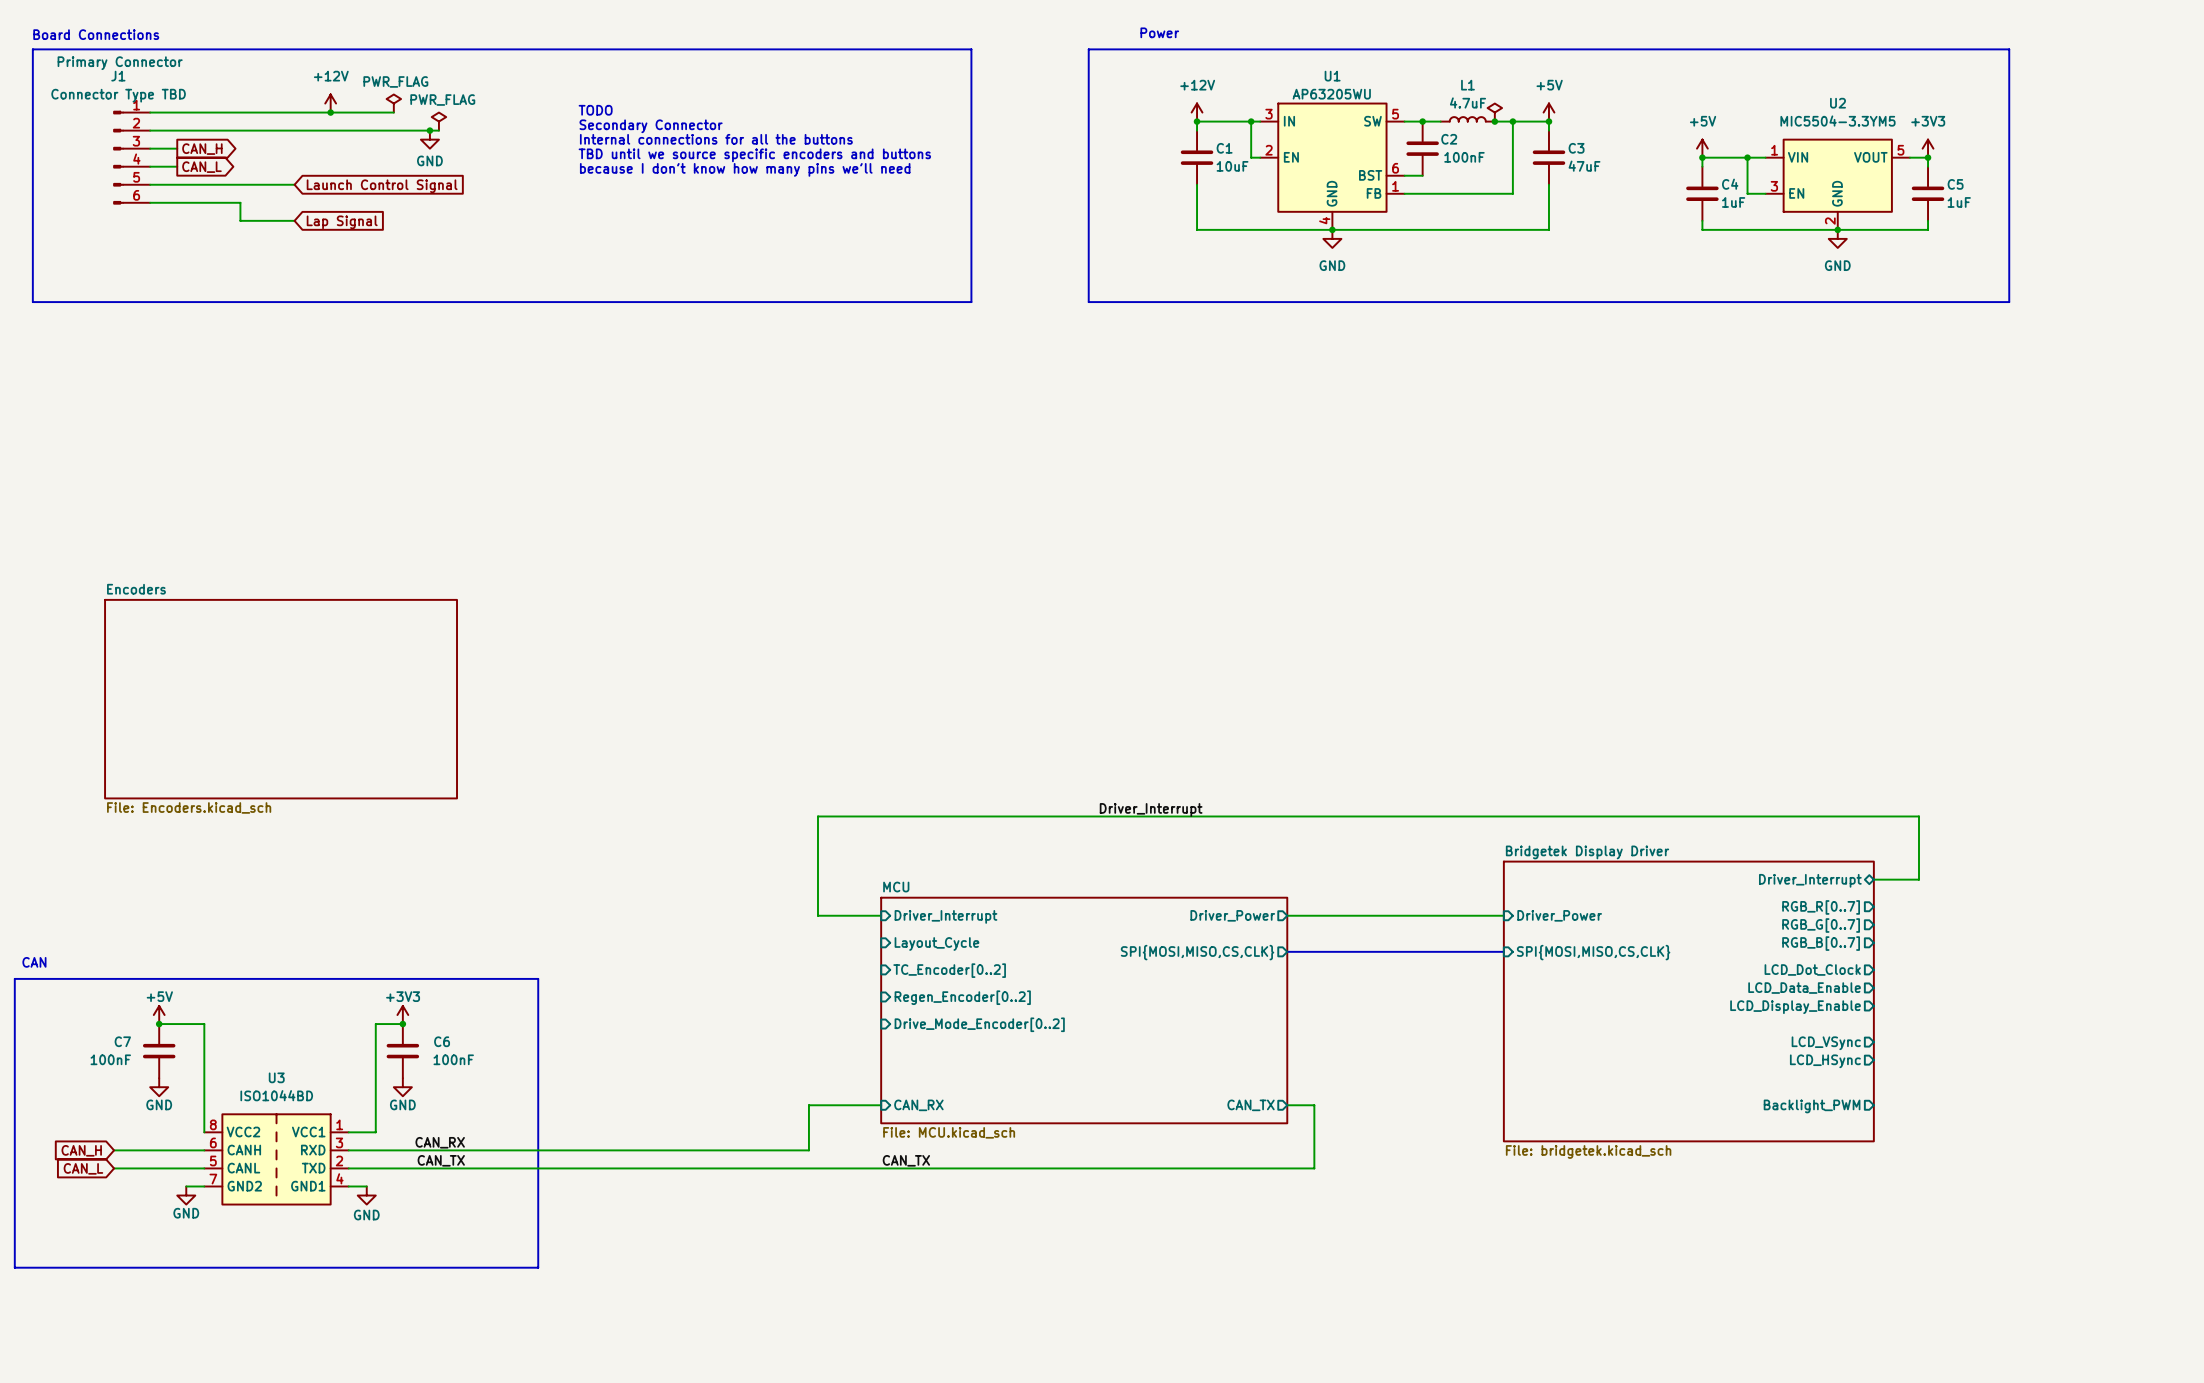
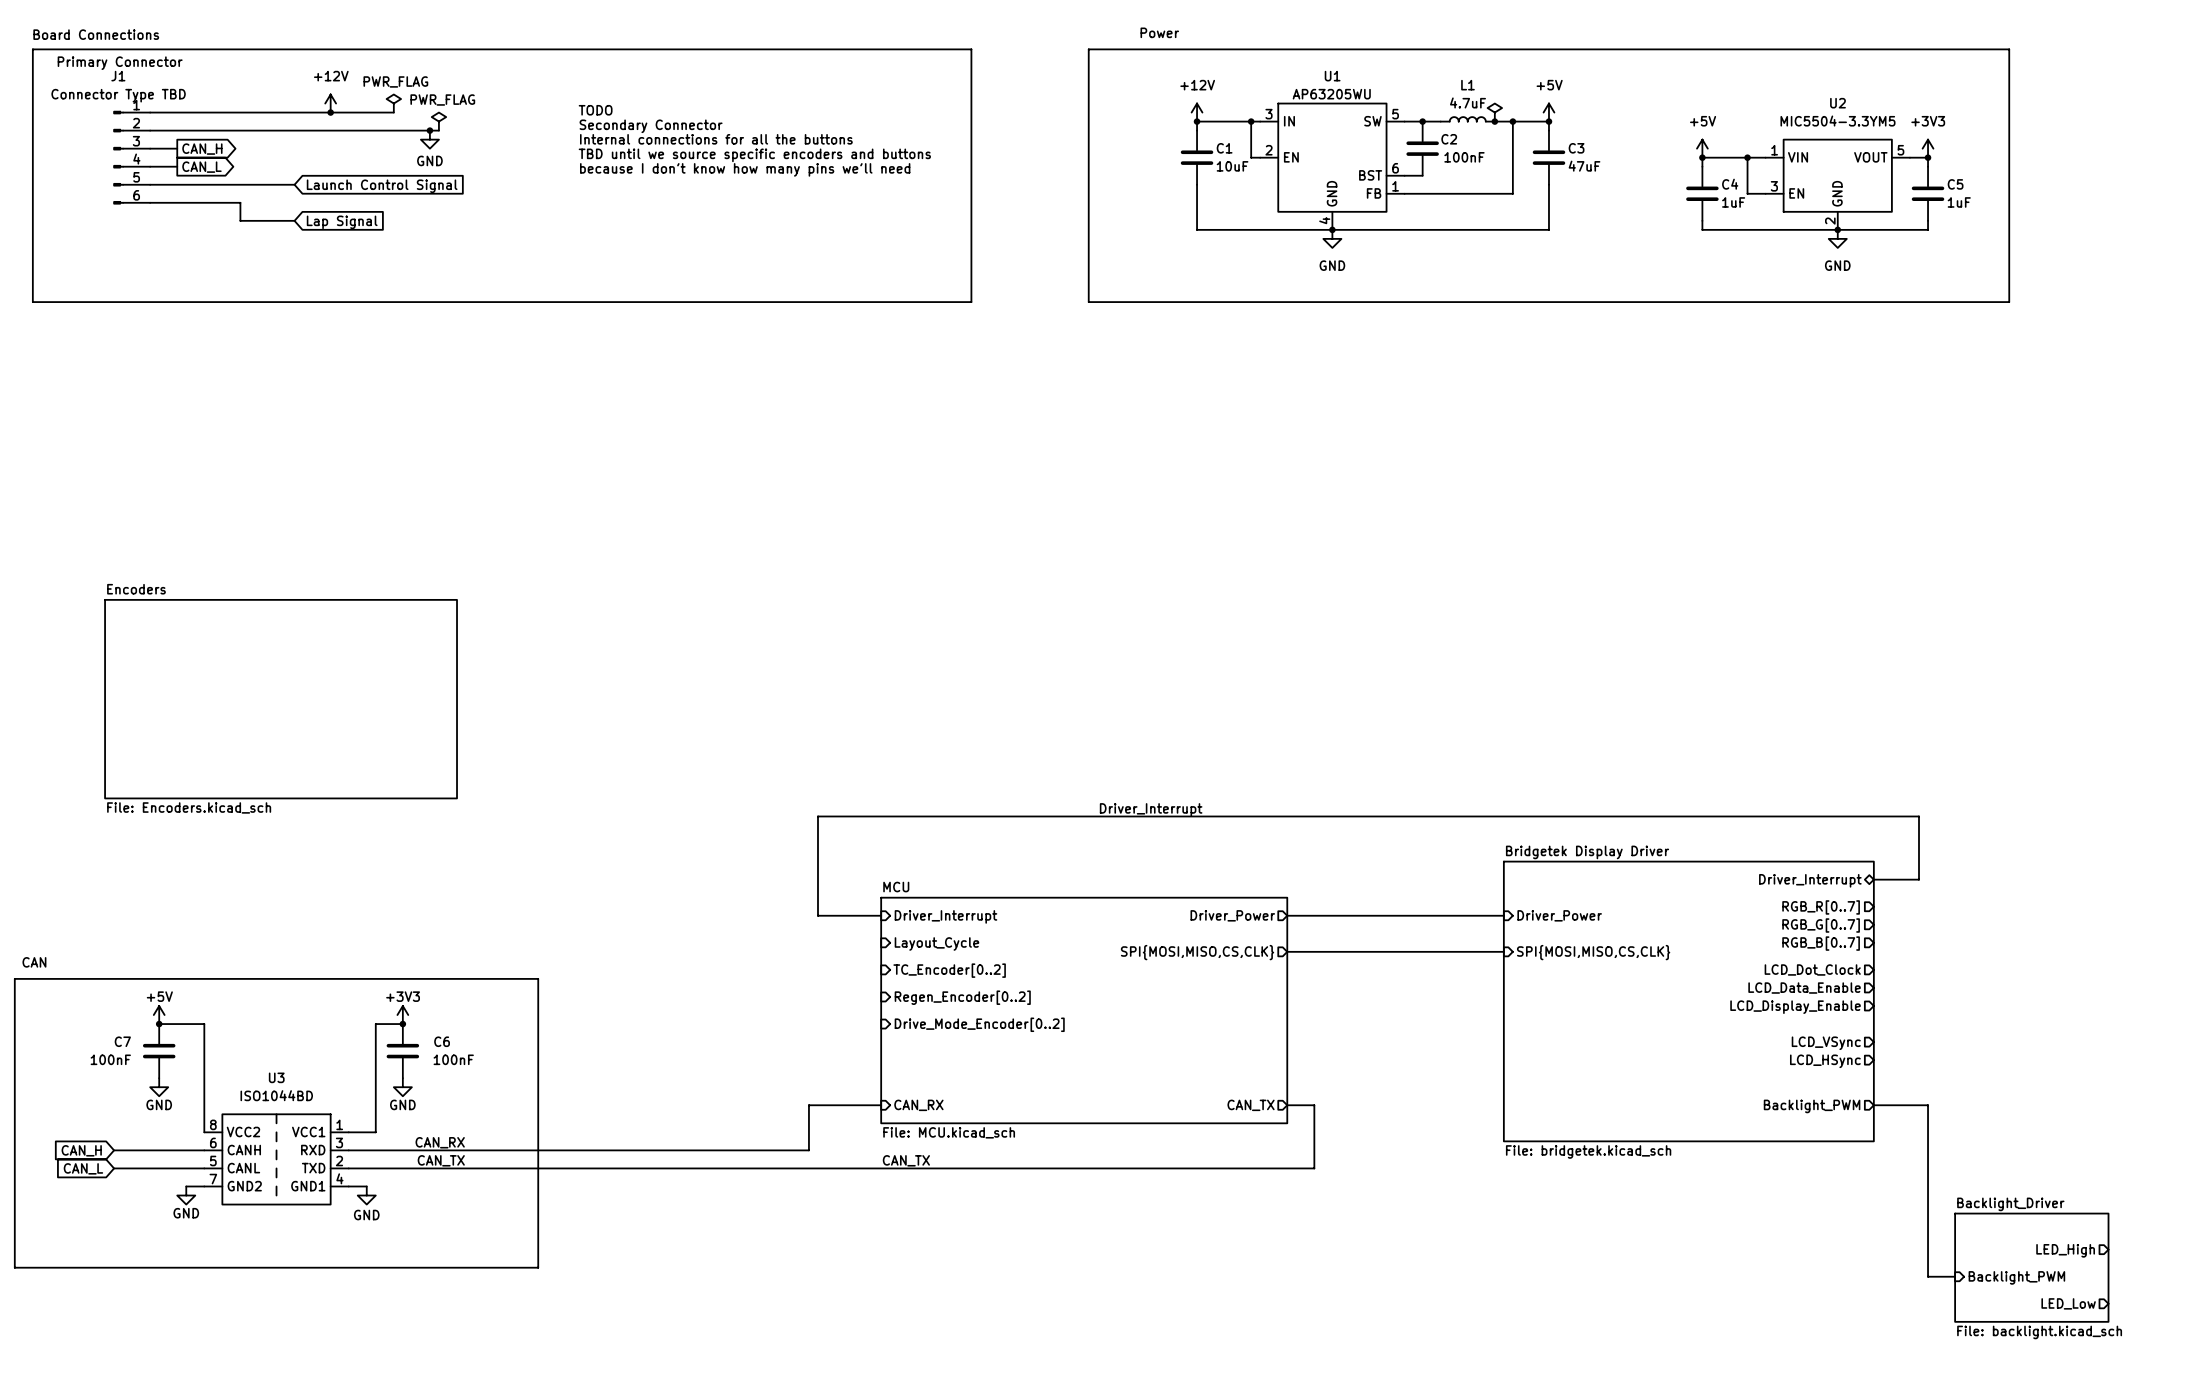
wire: none -> (1873, 1105) (1928, 1105) (1928, 1276) (1955, 1276)
sheet pin: none -> LED_High (2065, 1250)
sheet Backlight_Driver: none -> File: backlight.kicad_sch (2031, 1267)
sheet pin: none -> Backlight_PWM (2016, 1277)
sheet pin: none -> LED_Low (2068, 1303)

